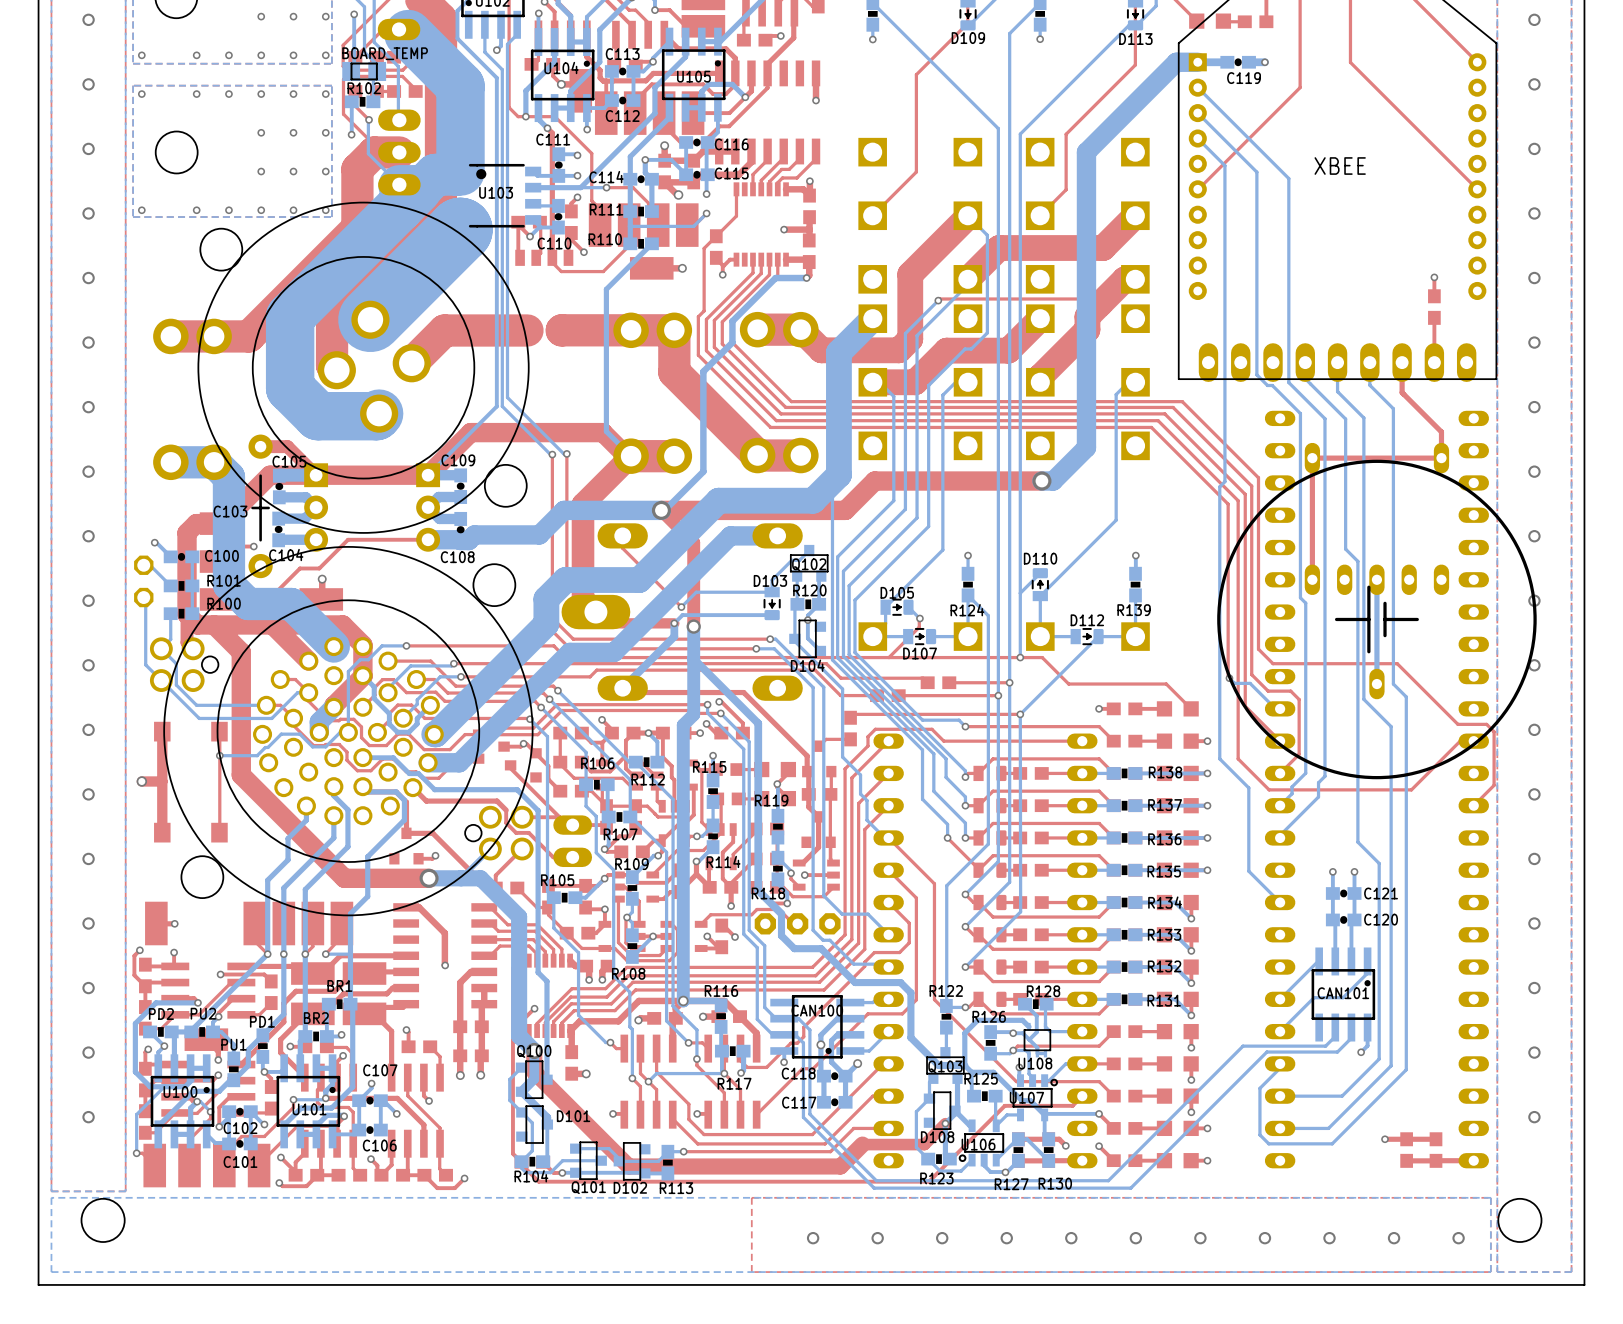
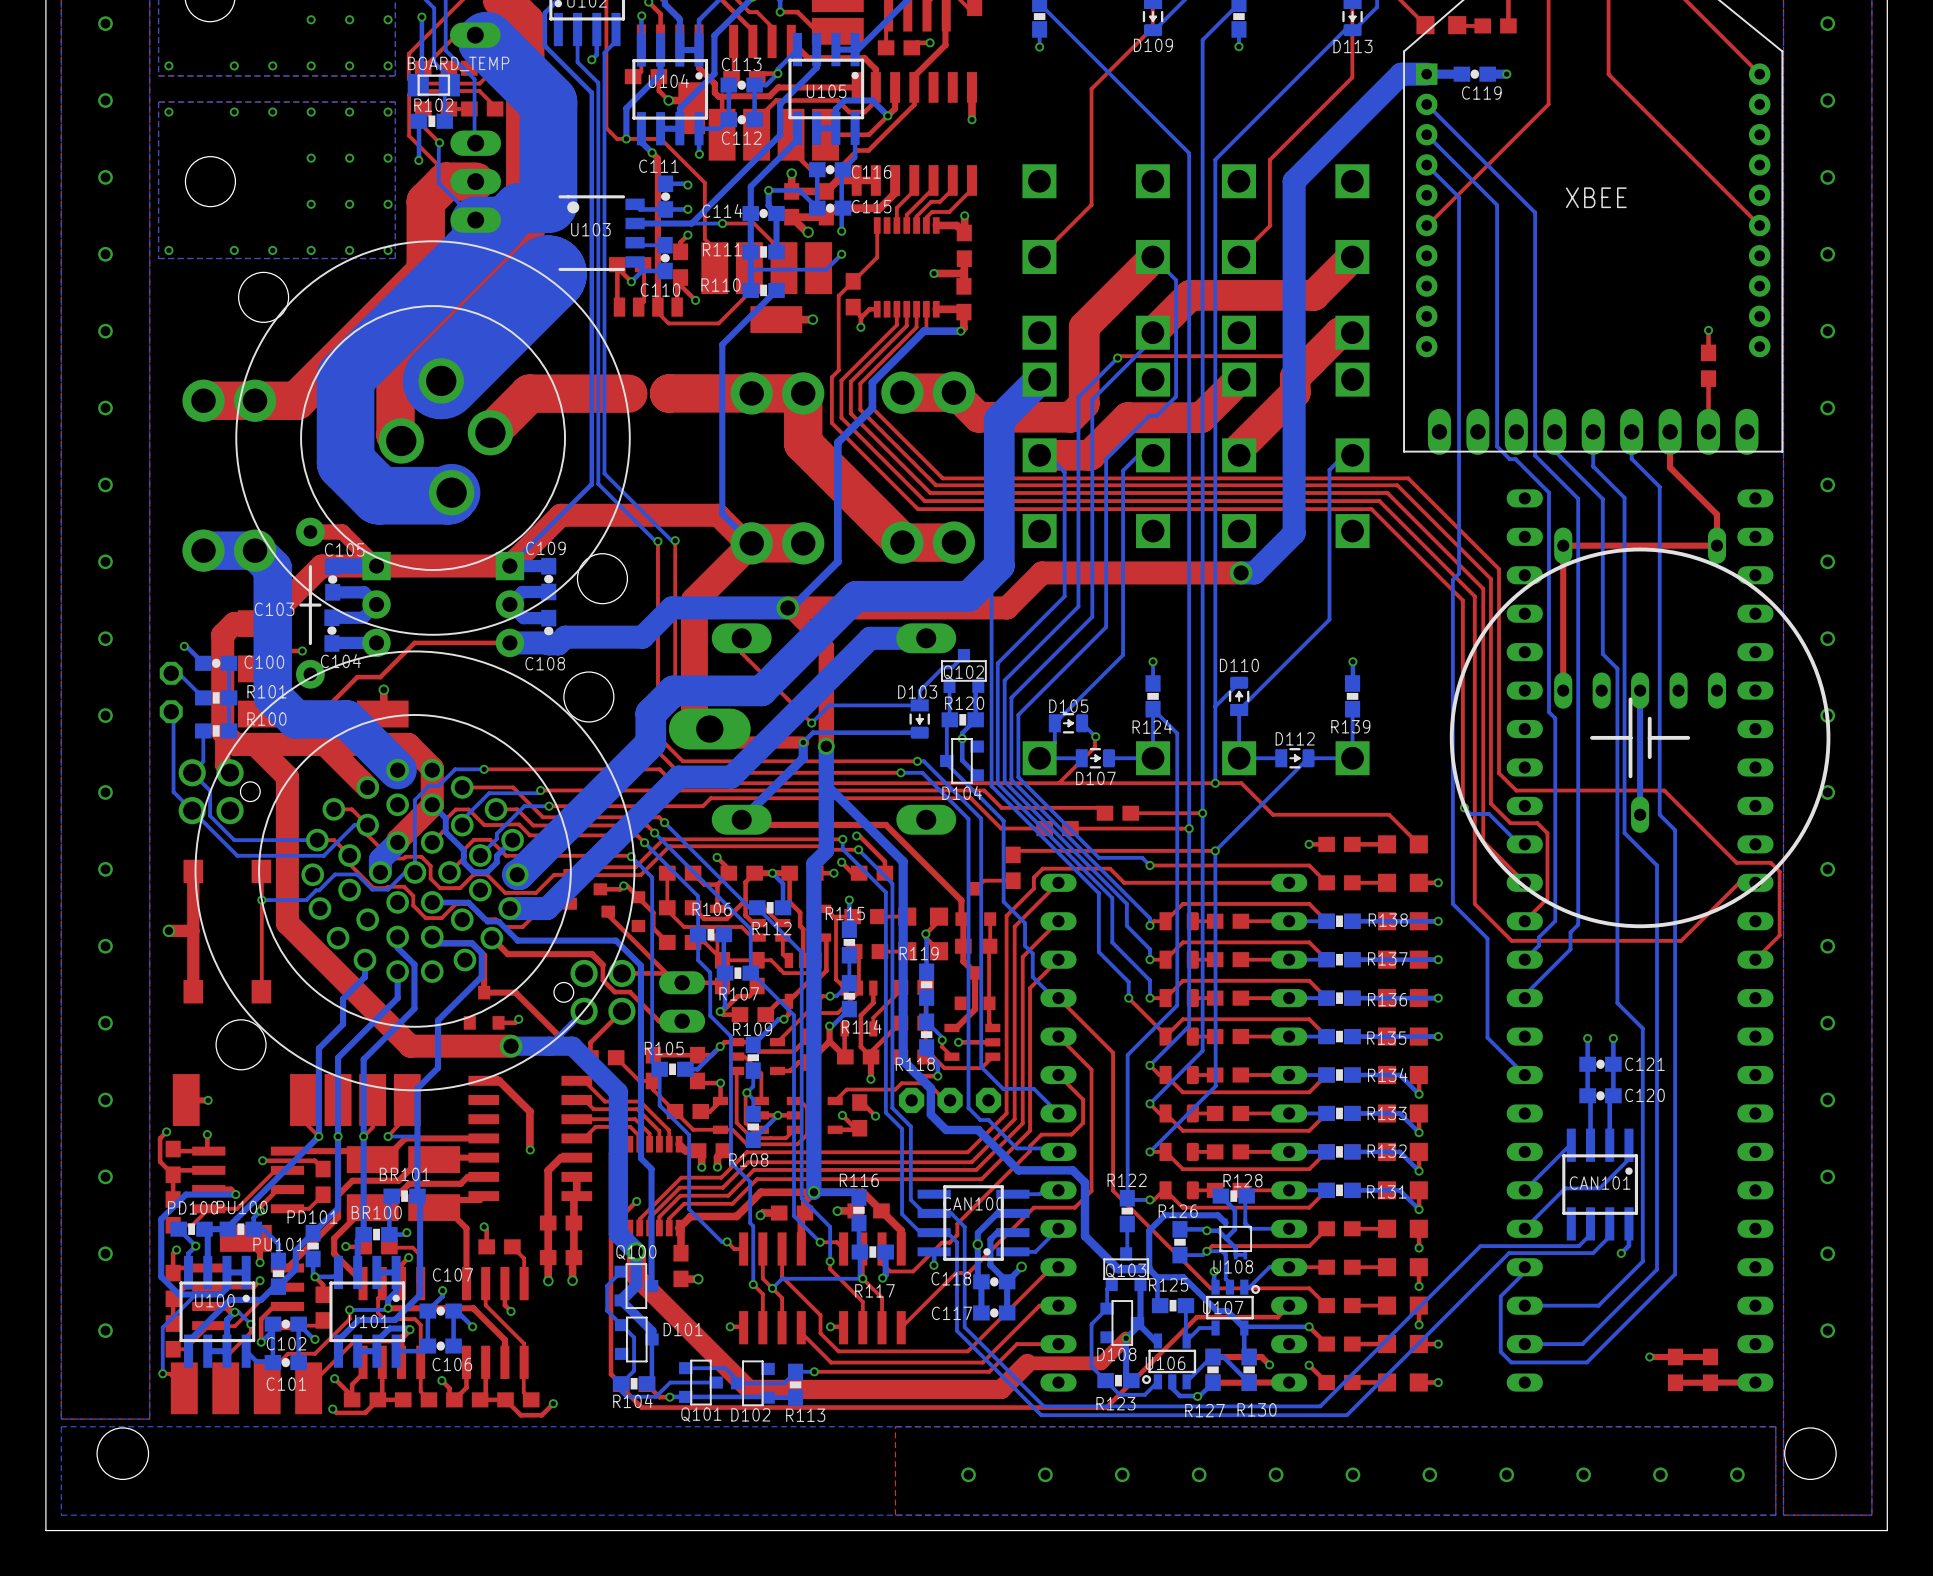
BR1 name: BR1 (339, 985) -> BR101 (404, 1174)
PU2 name: PU2 (203, 1013) -> PU100 (242, 1207)
PD2 name: PD2 (161, 1014) -> PD100 (193, 1207)
BR2 name: BR2 (316, 1018) -> BR100 (376, 1212)
PD1 name: PD1 (262, 1021) -> PD101 (312, 1217)
PU1 name: PU1 (234, 1044) -> PU101 (278, 1244)

